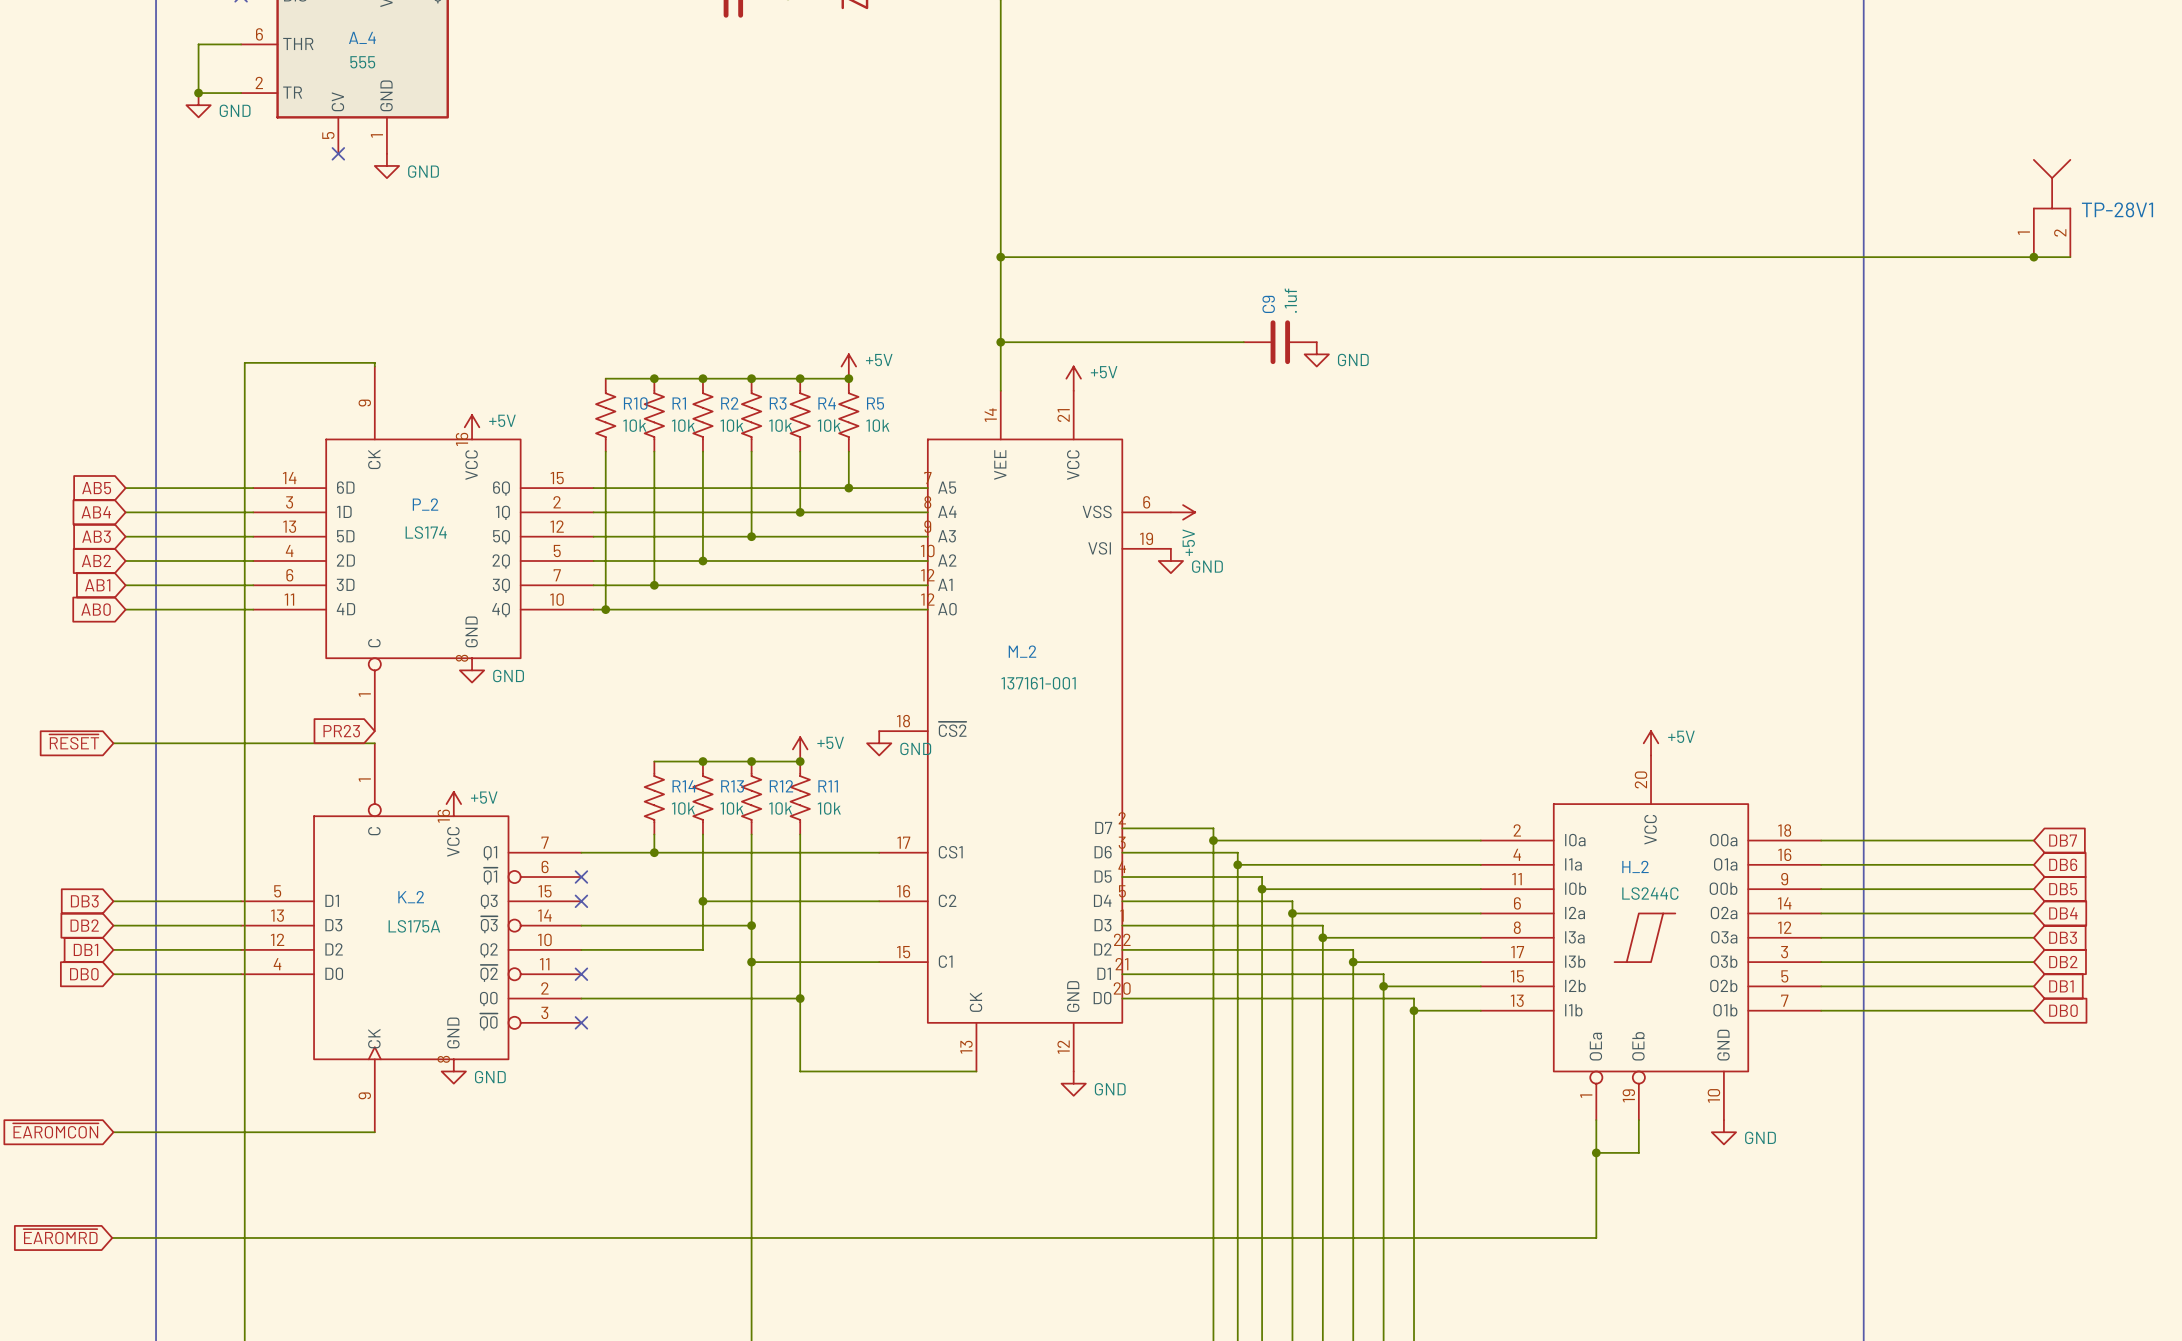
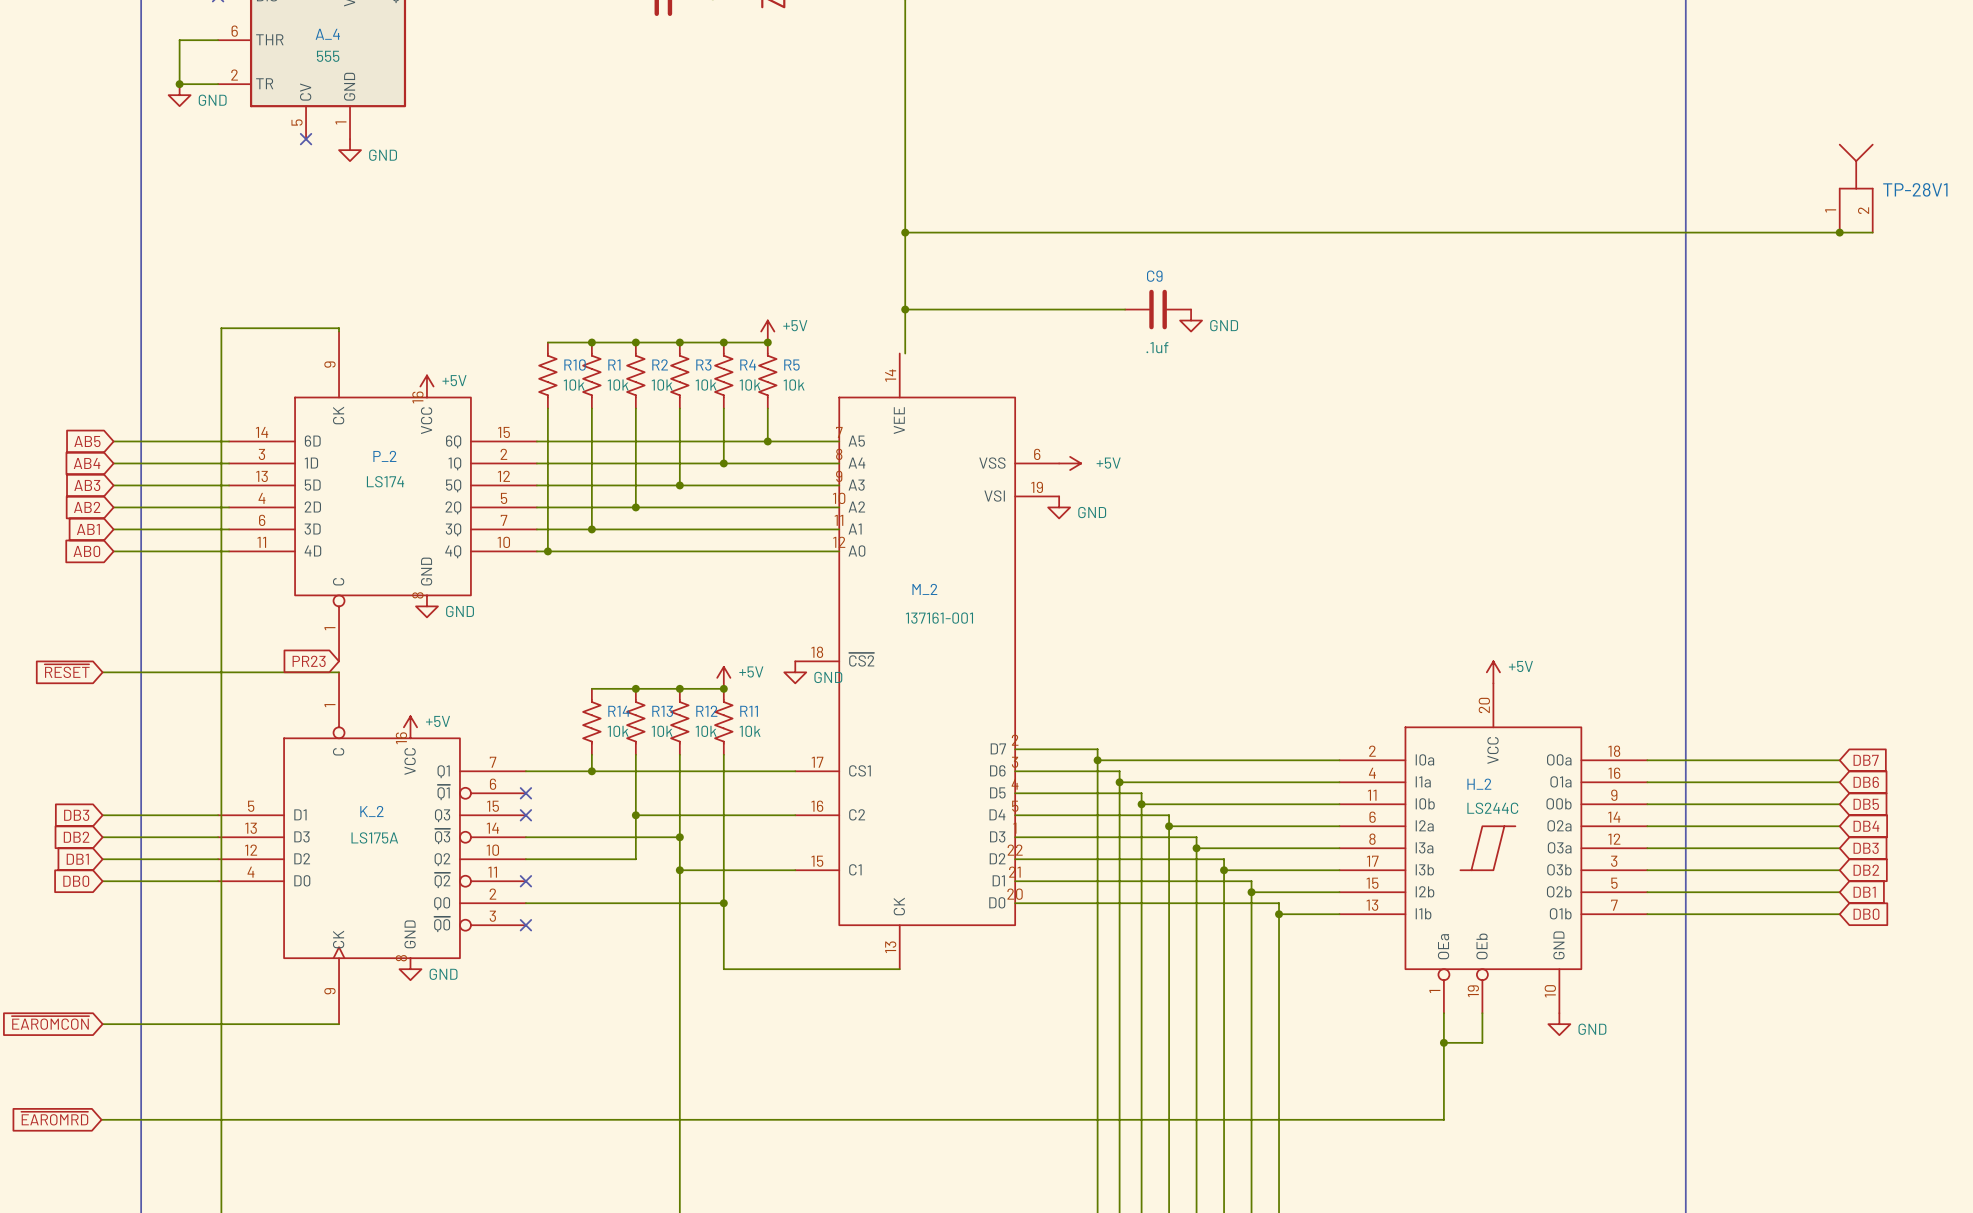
C9 value rotation: 0° (1290, 300) -> 90° clockwise (1157, 347)
C9 value position: .1uf (1290, 300) -> .1uf (1157, 347)
C9 name rotation: 0° (1268, 304) -> 90° clockwise (1154, 276)
power symbol: +5V (1073, 378) -> none
M_2 symbol: [879, 390, 1171, 1072] -> [795, 353, 1060, 970]
power symbol text rotation: 0° (1188, 542) -> 90° clockwise (1108, 463)
power symbol text position: +5V (1188, 542) -> +5V (1108, 463)
wire: none -> (883, 969) (899, 969)
power symbol: GND (1073, 1083) -> none

